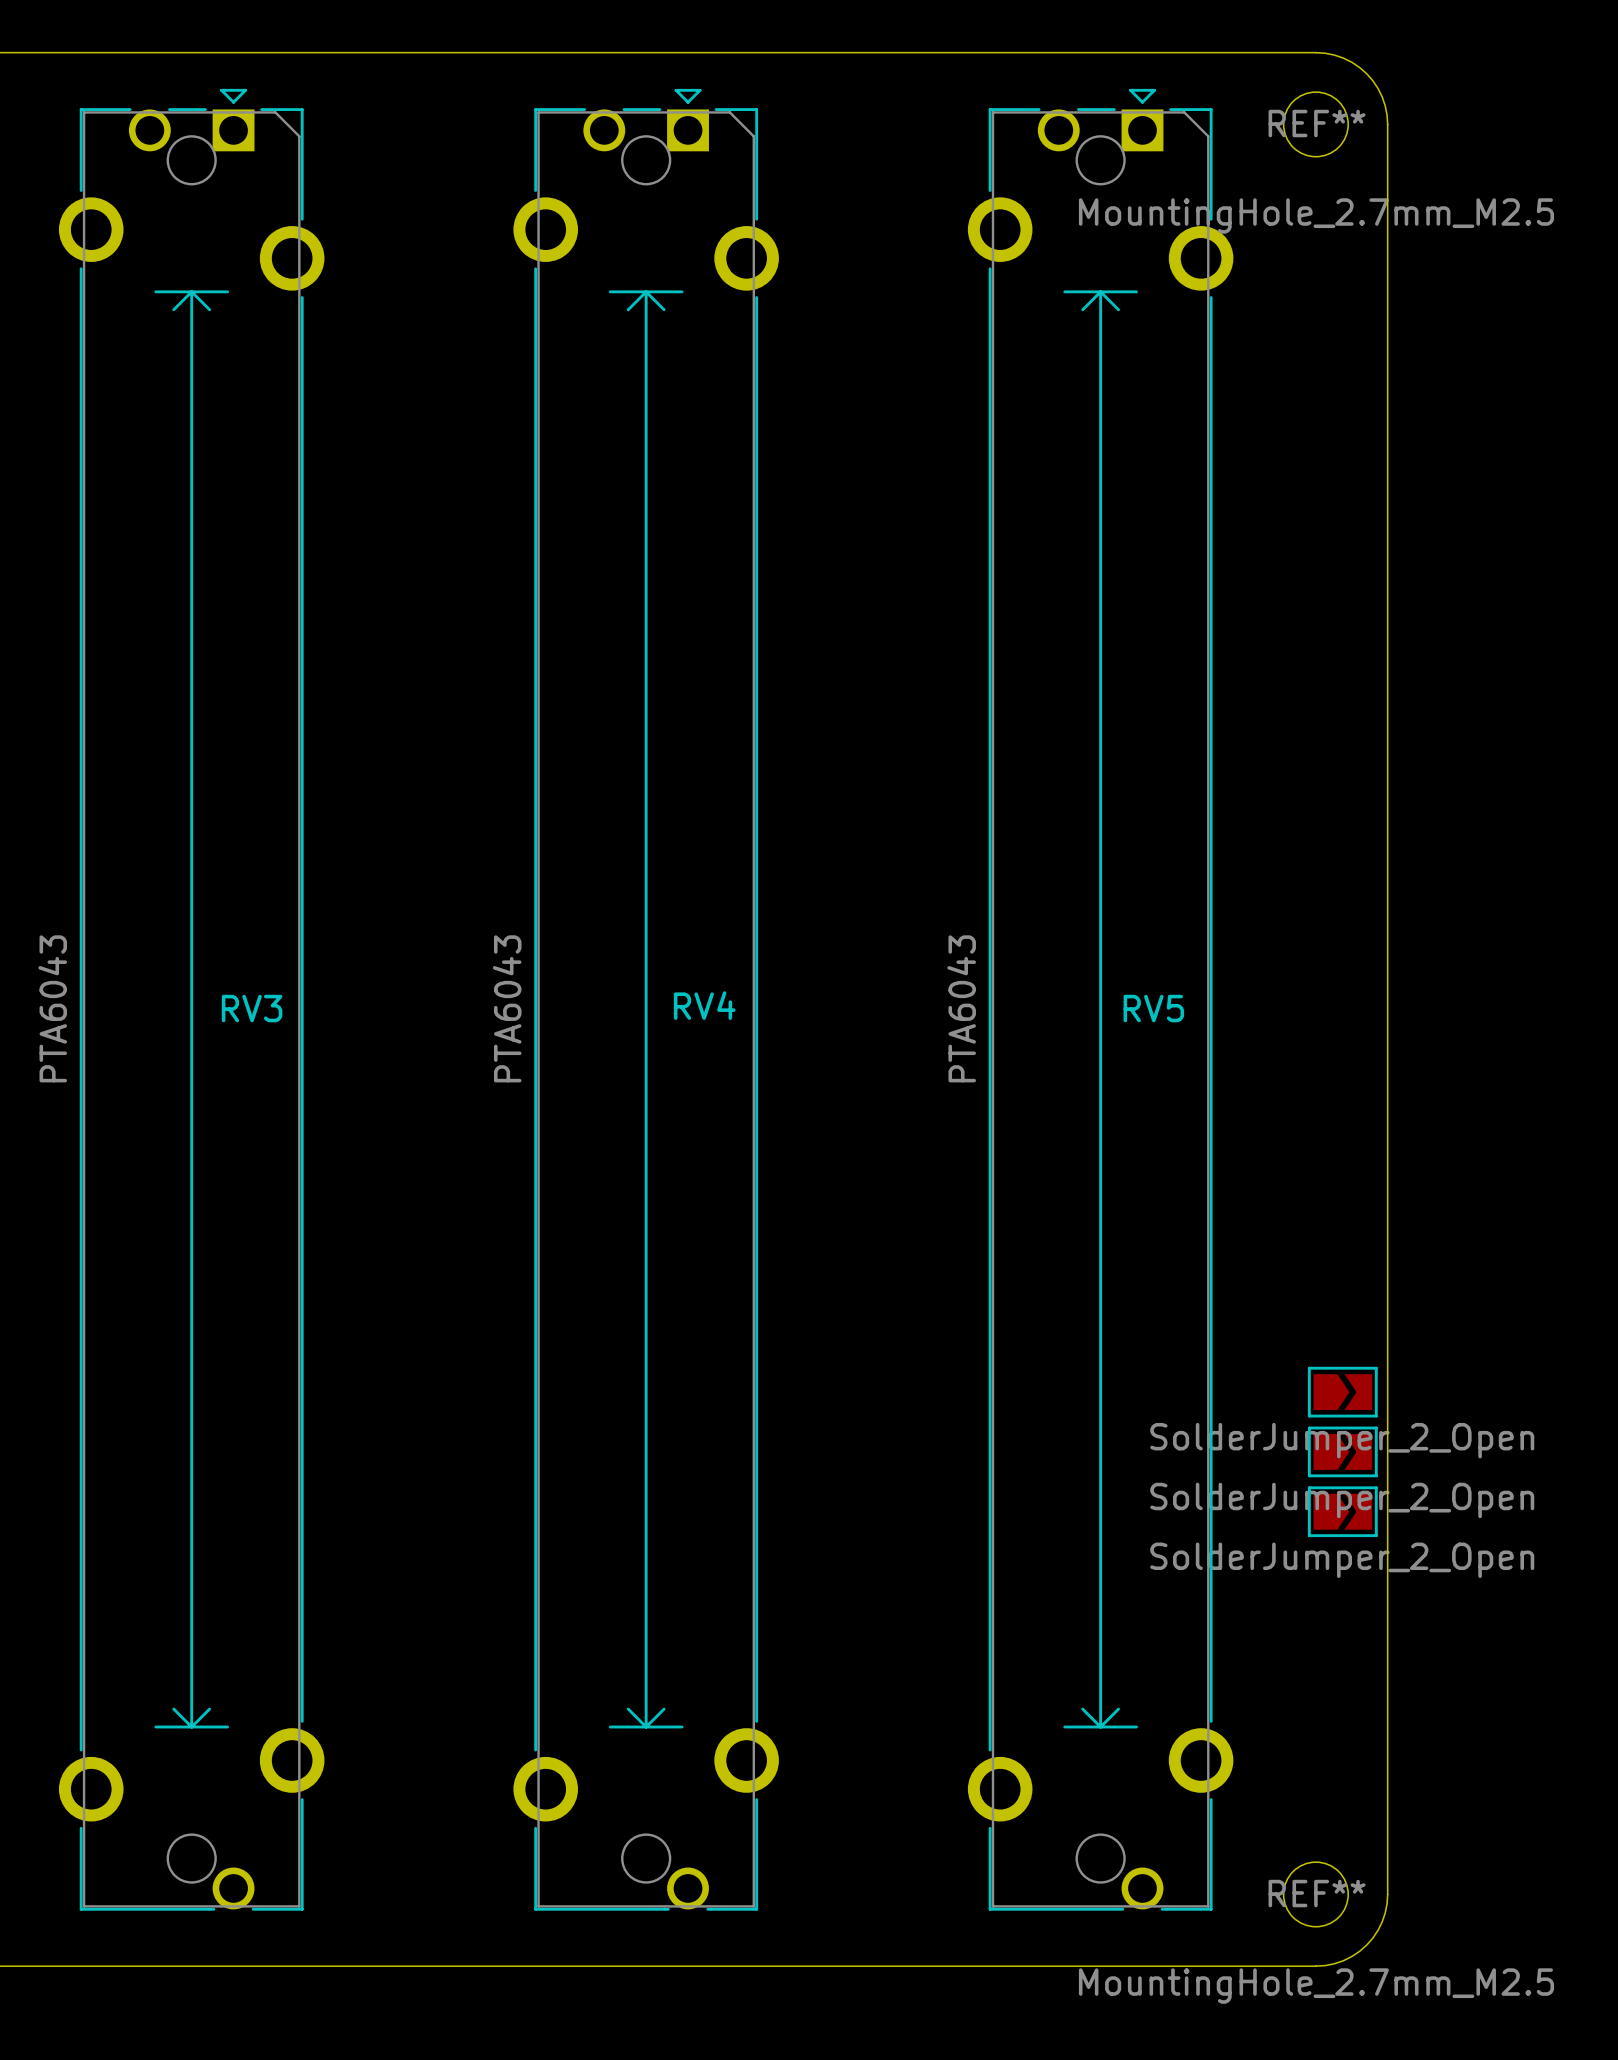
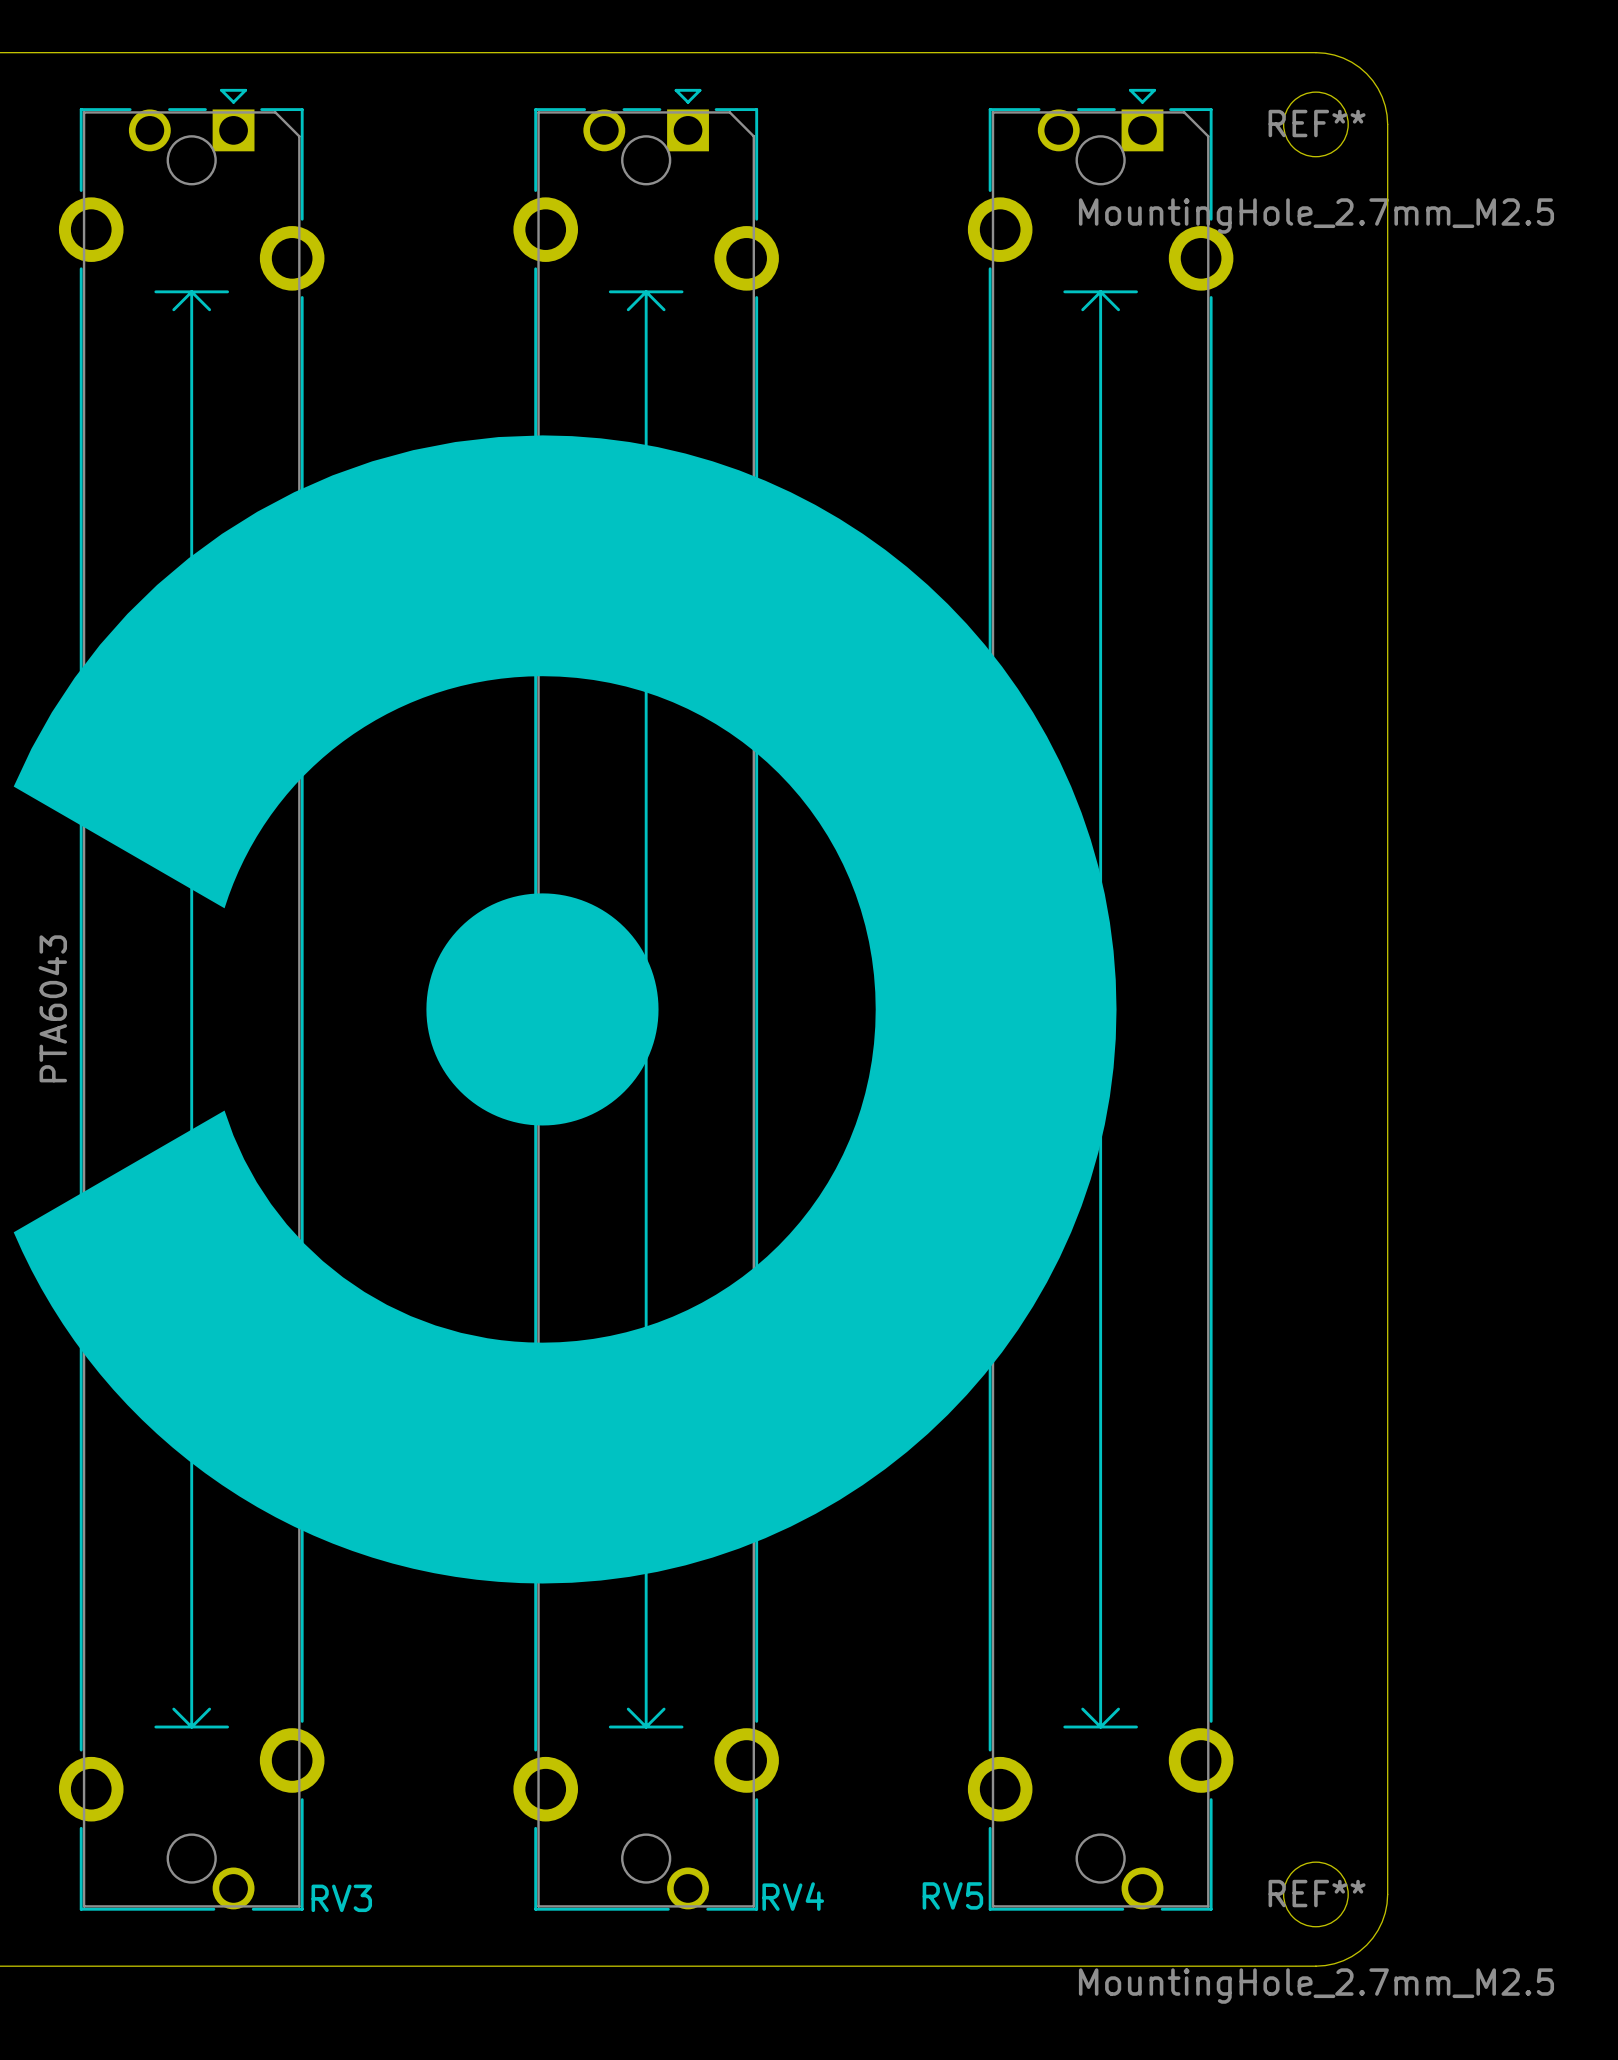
drawing: none -> [13, 435, 1117, 1584]
RV4 name position: RV4 (704, 1005) -> RV4 (793, 1896)
RV3 name position: RV3 (252, 1008) -> RV3 (341, 1898)
RV5 name position: RV5 (1153, 1008) -> RV5 (952, 1895)
part: SolderJumper_2_Open (1342, 1392) -> none
part: SolderJumper_2_Open (1342, 1451) -> none
part: SolderJumper_2_Open (1342, 1511) -> none

